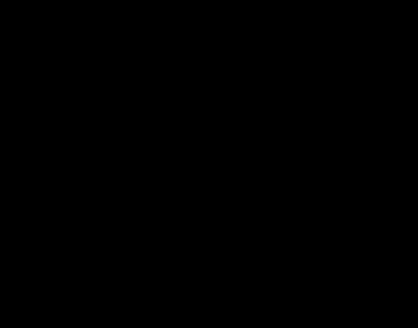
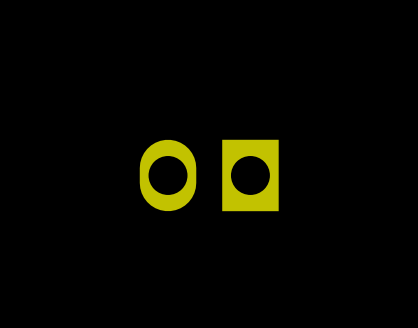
part: none -> (209, 175)

